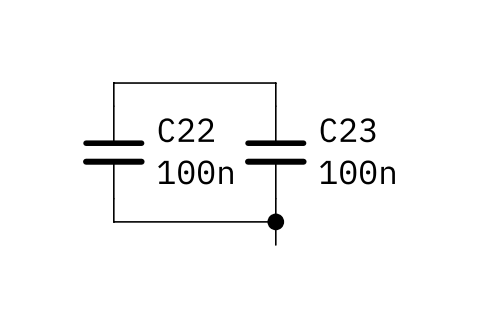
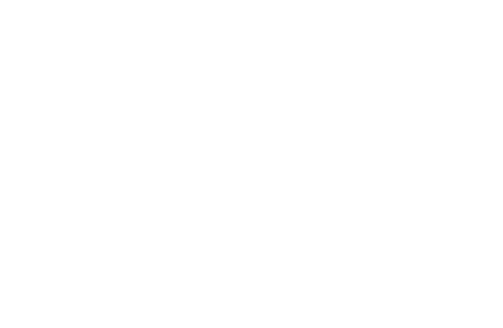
wire: (113, 106) (113, 83) (275, 83) (275, 106) -> none
C22: 100n (113, 152) -> none
C23: 100n (275, 152) -> none
wire: (113, 198) (113, 221) (275, 221) -> none
wire: (275, 198) (275, 245) -> none
junction: (275, 221) -> none

